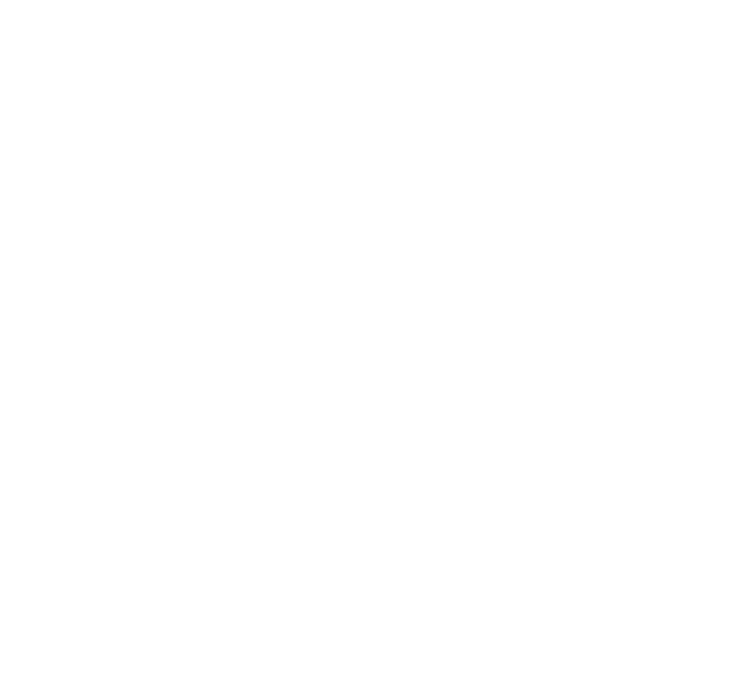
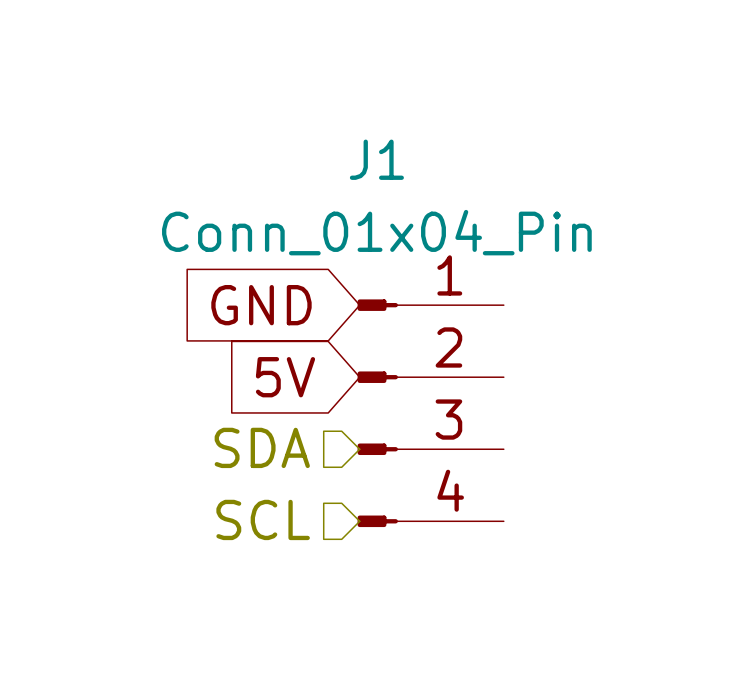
global label: none -> GND (261, 305)
global label: none -> 5V (285, 377)
J1: none -> Conn_01x04_Pin (430, 413)
hierarchical label: none -> SDA (262, 447)
hierarchical label: none -> SCL (263, 519)

